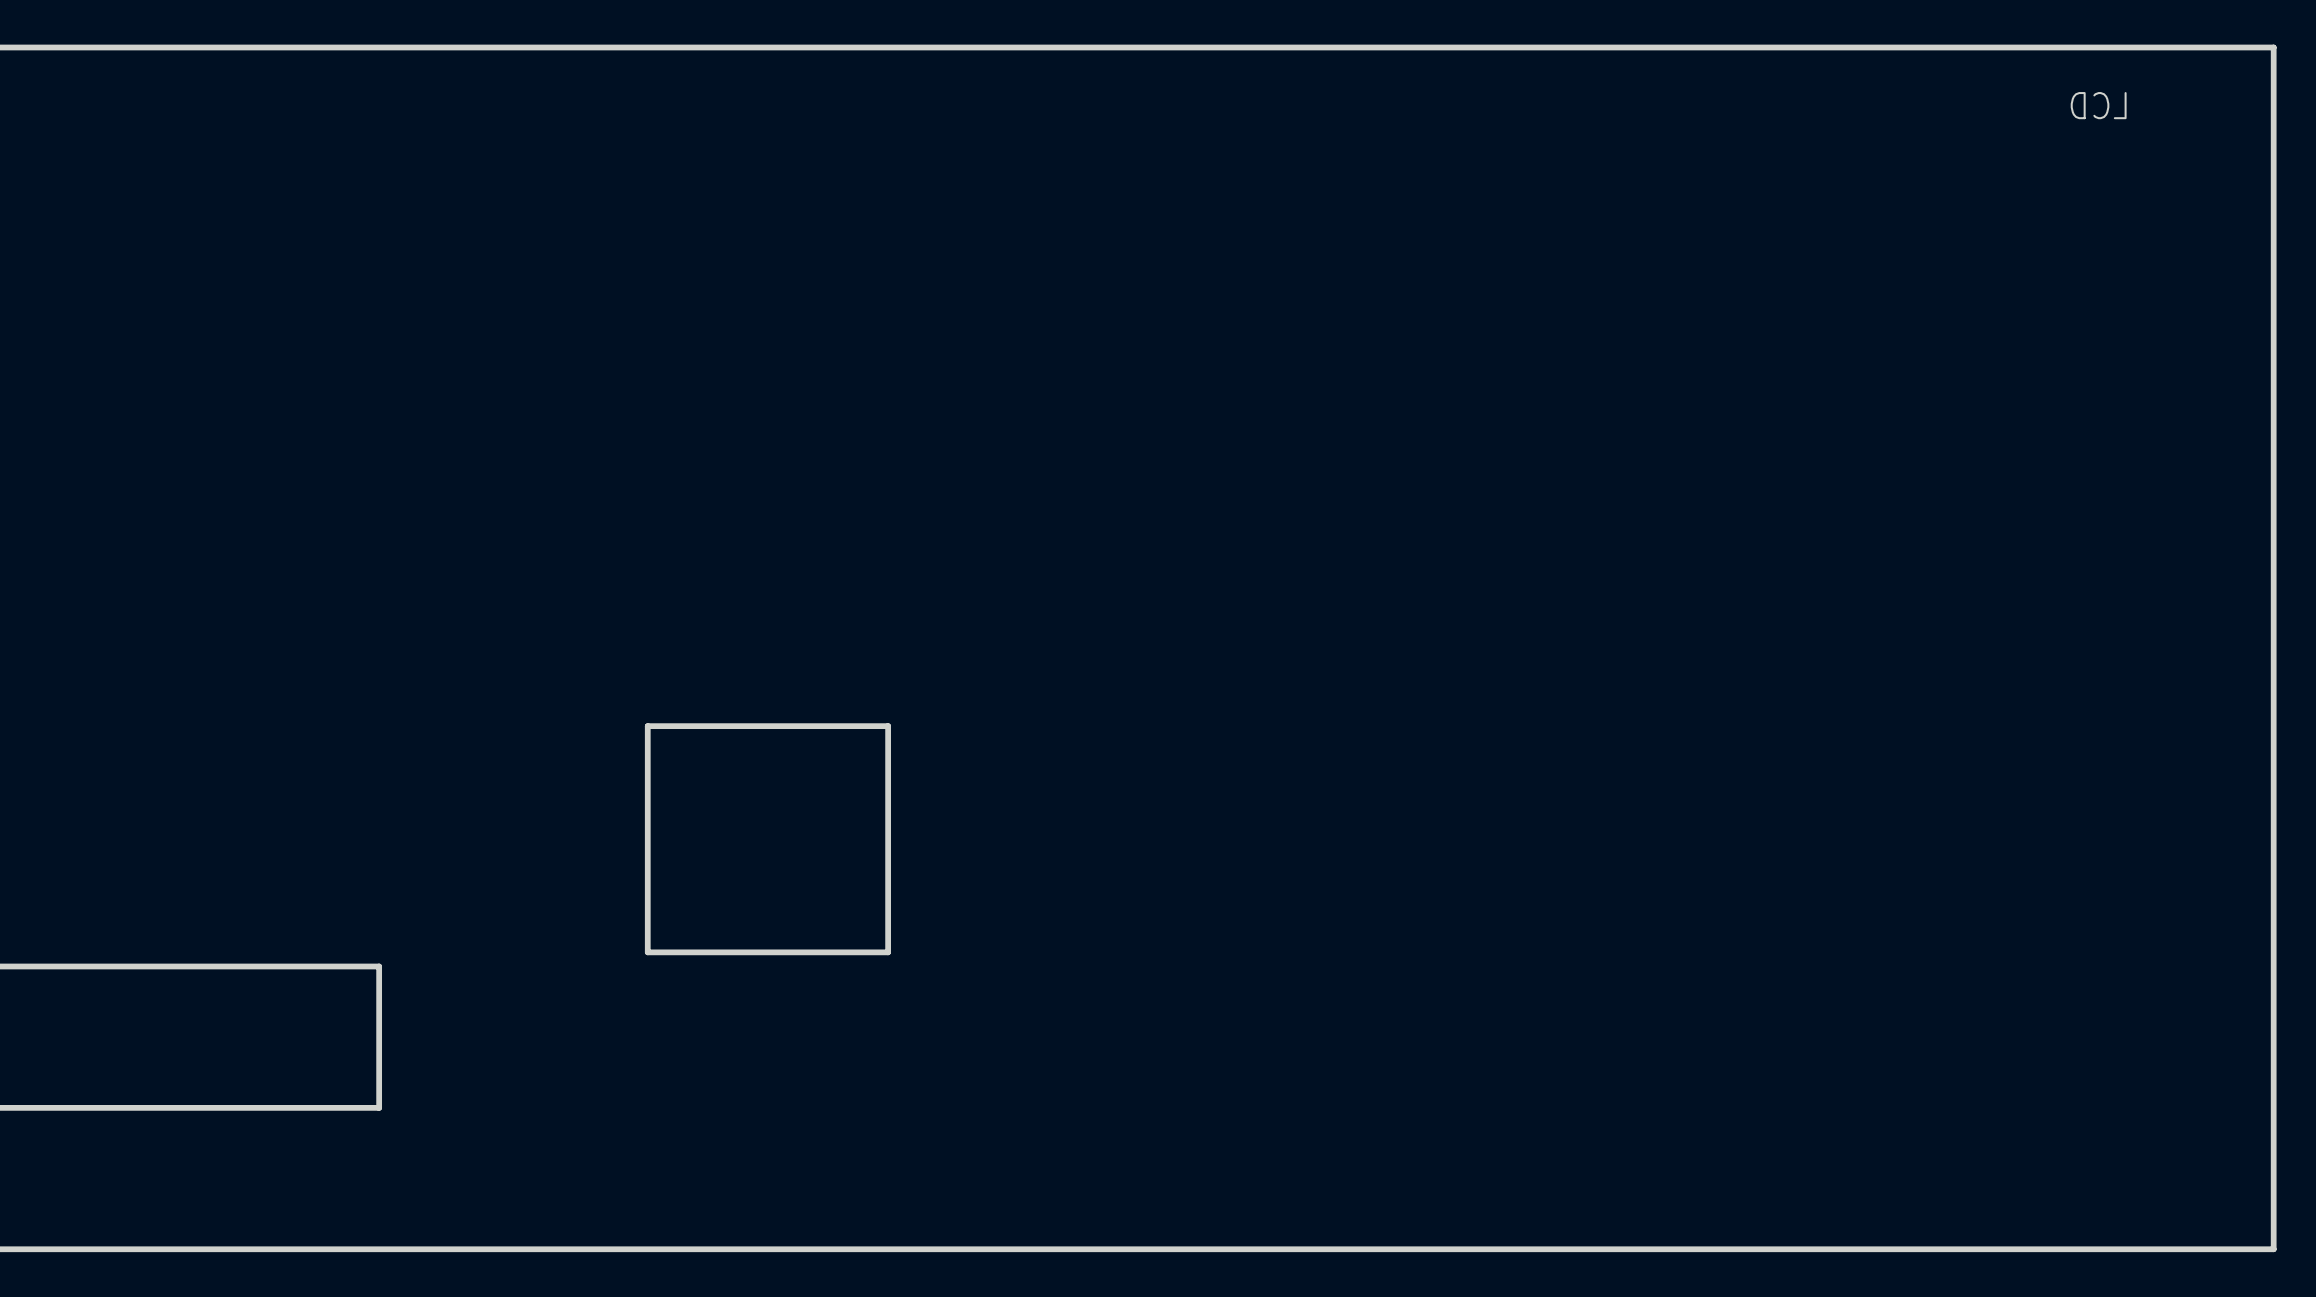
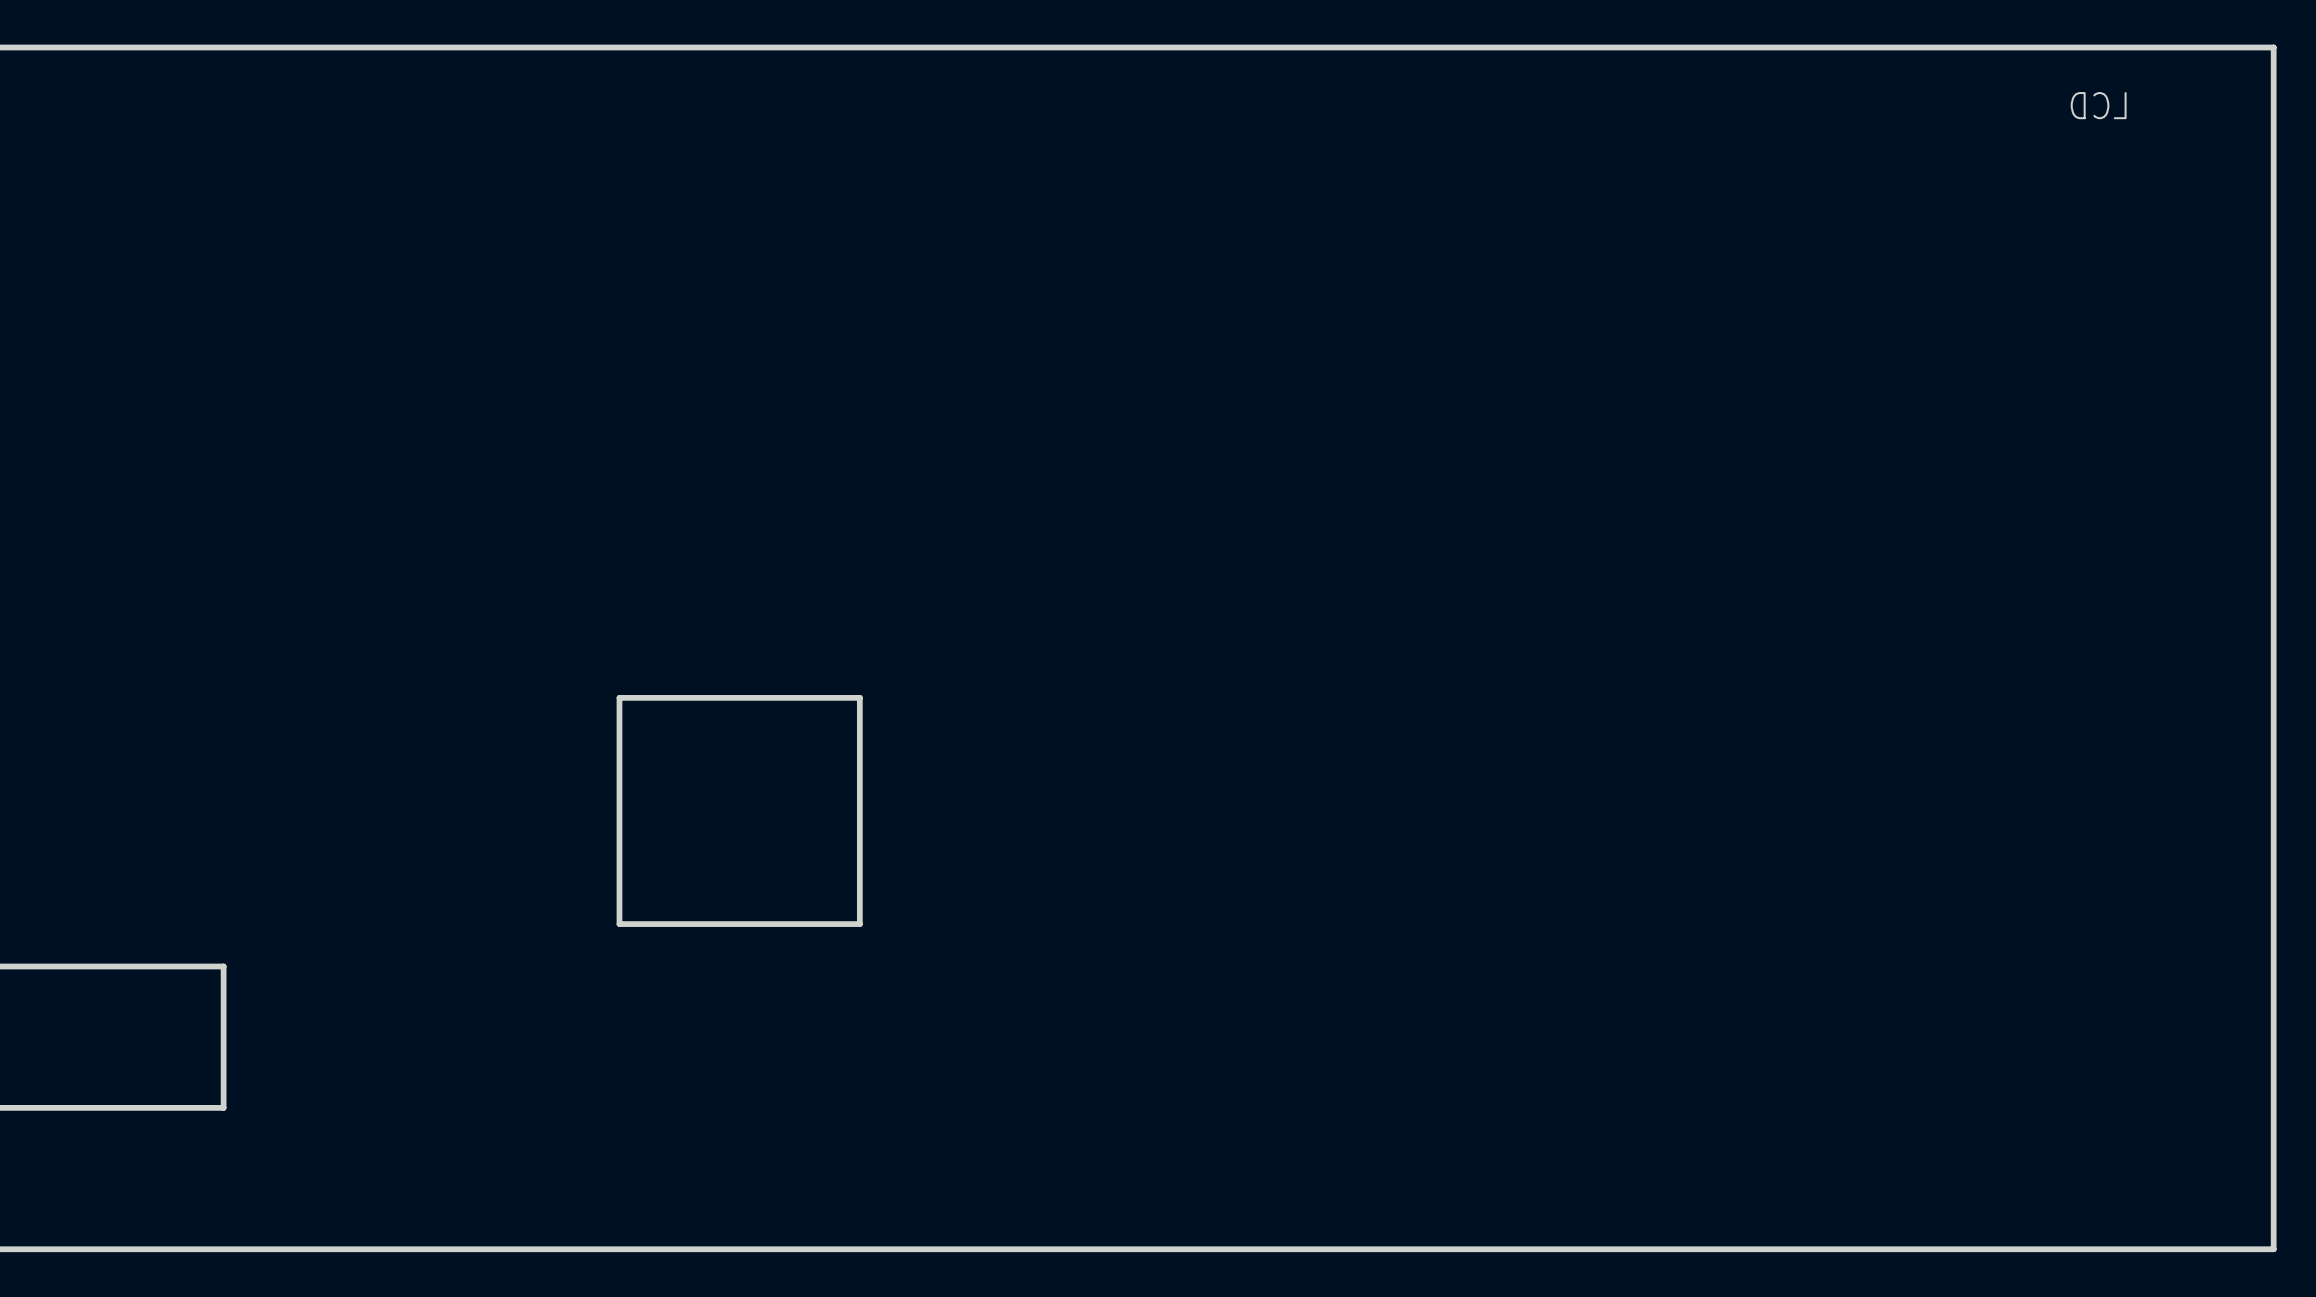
board edge: (888, 726) (888, 952) (647, 952) (647, 726) (888, 726) -> (859, 697) (859, 924) (619, 924) (619, 697) (859, 697)
board edge: (223, 966) (379, 966) (379, 1107) (223, 1107) -> (223, 966) (223, 1107)

